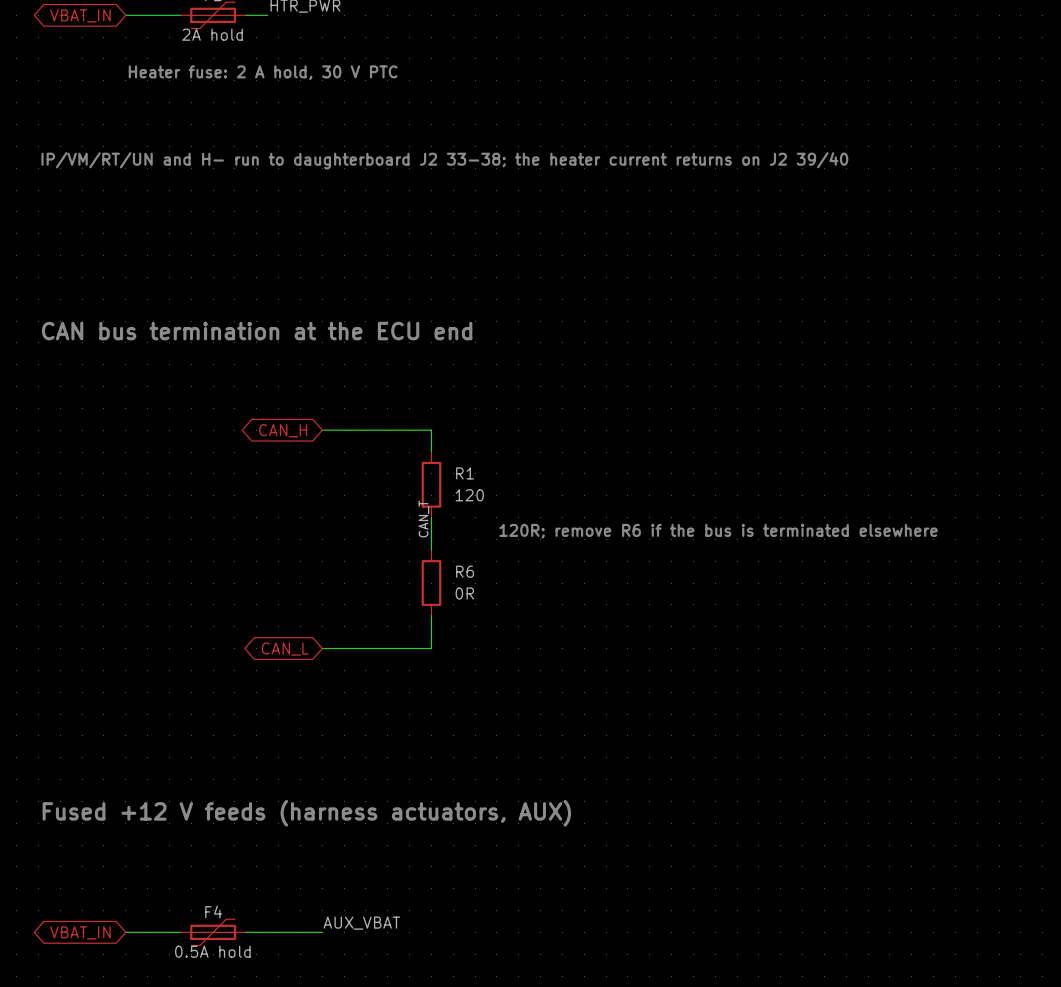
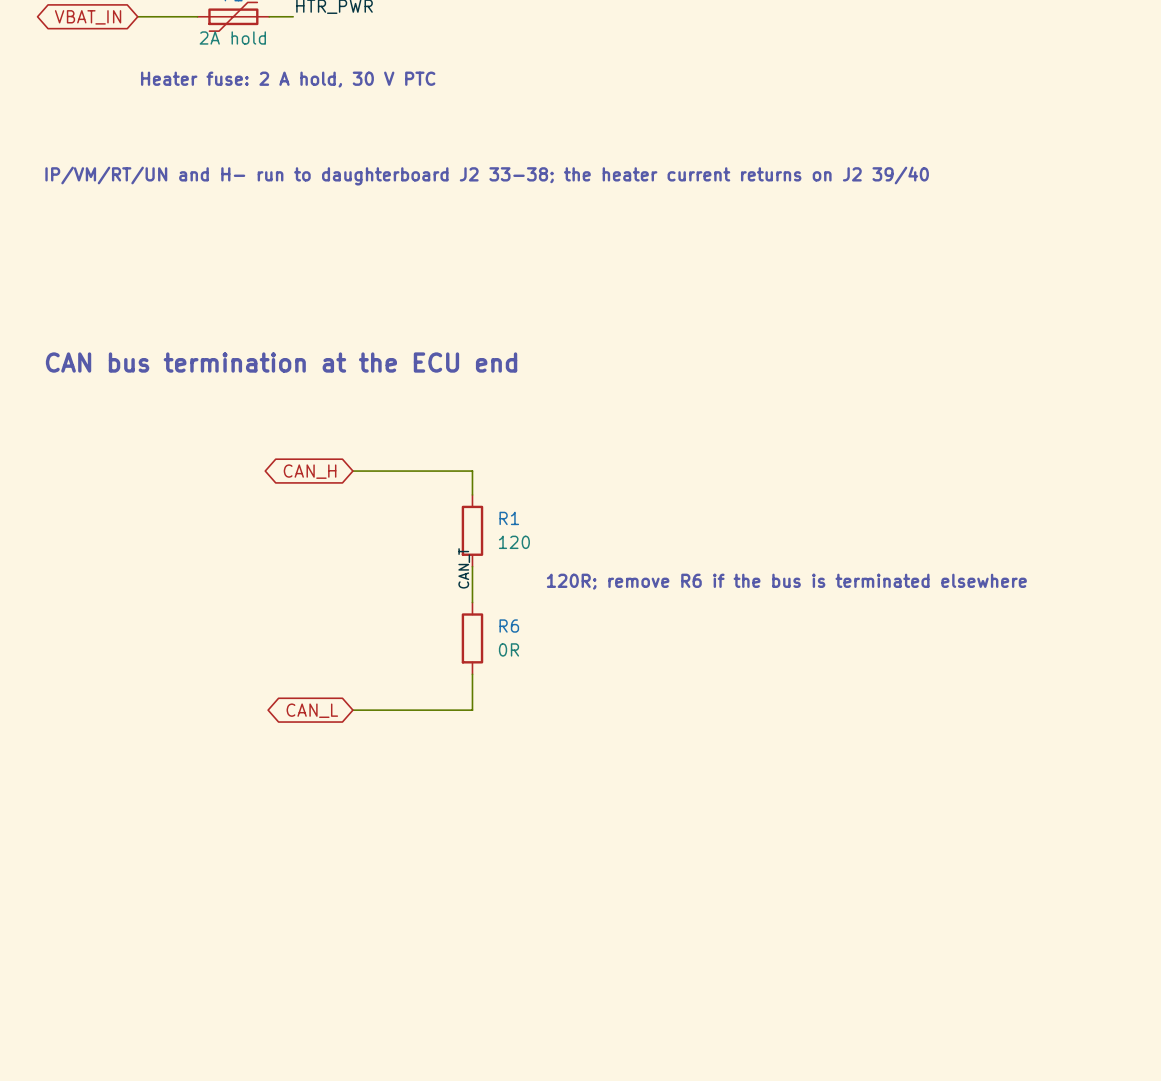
text: Fused +12 V feeds (harness actuators, AUX) (306, 813) -> none
label: AUX_VBAT (361, 923) -> none
global label: VBAT_IN (80, 932) -> none
wire: (125, 932) (180, 932) -> none
F4: 0.5A hold (213, 932) -> none
wire: (245, 932) (322, 932) -> none

